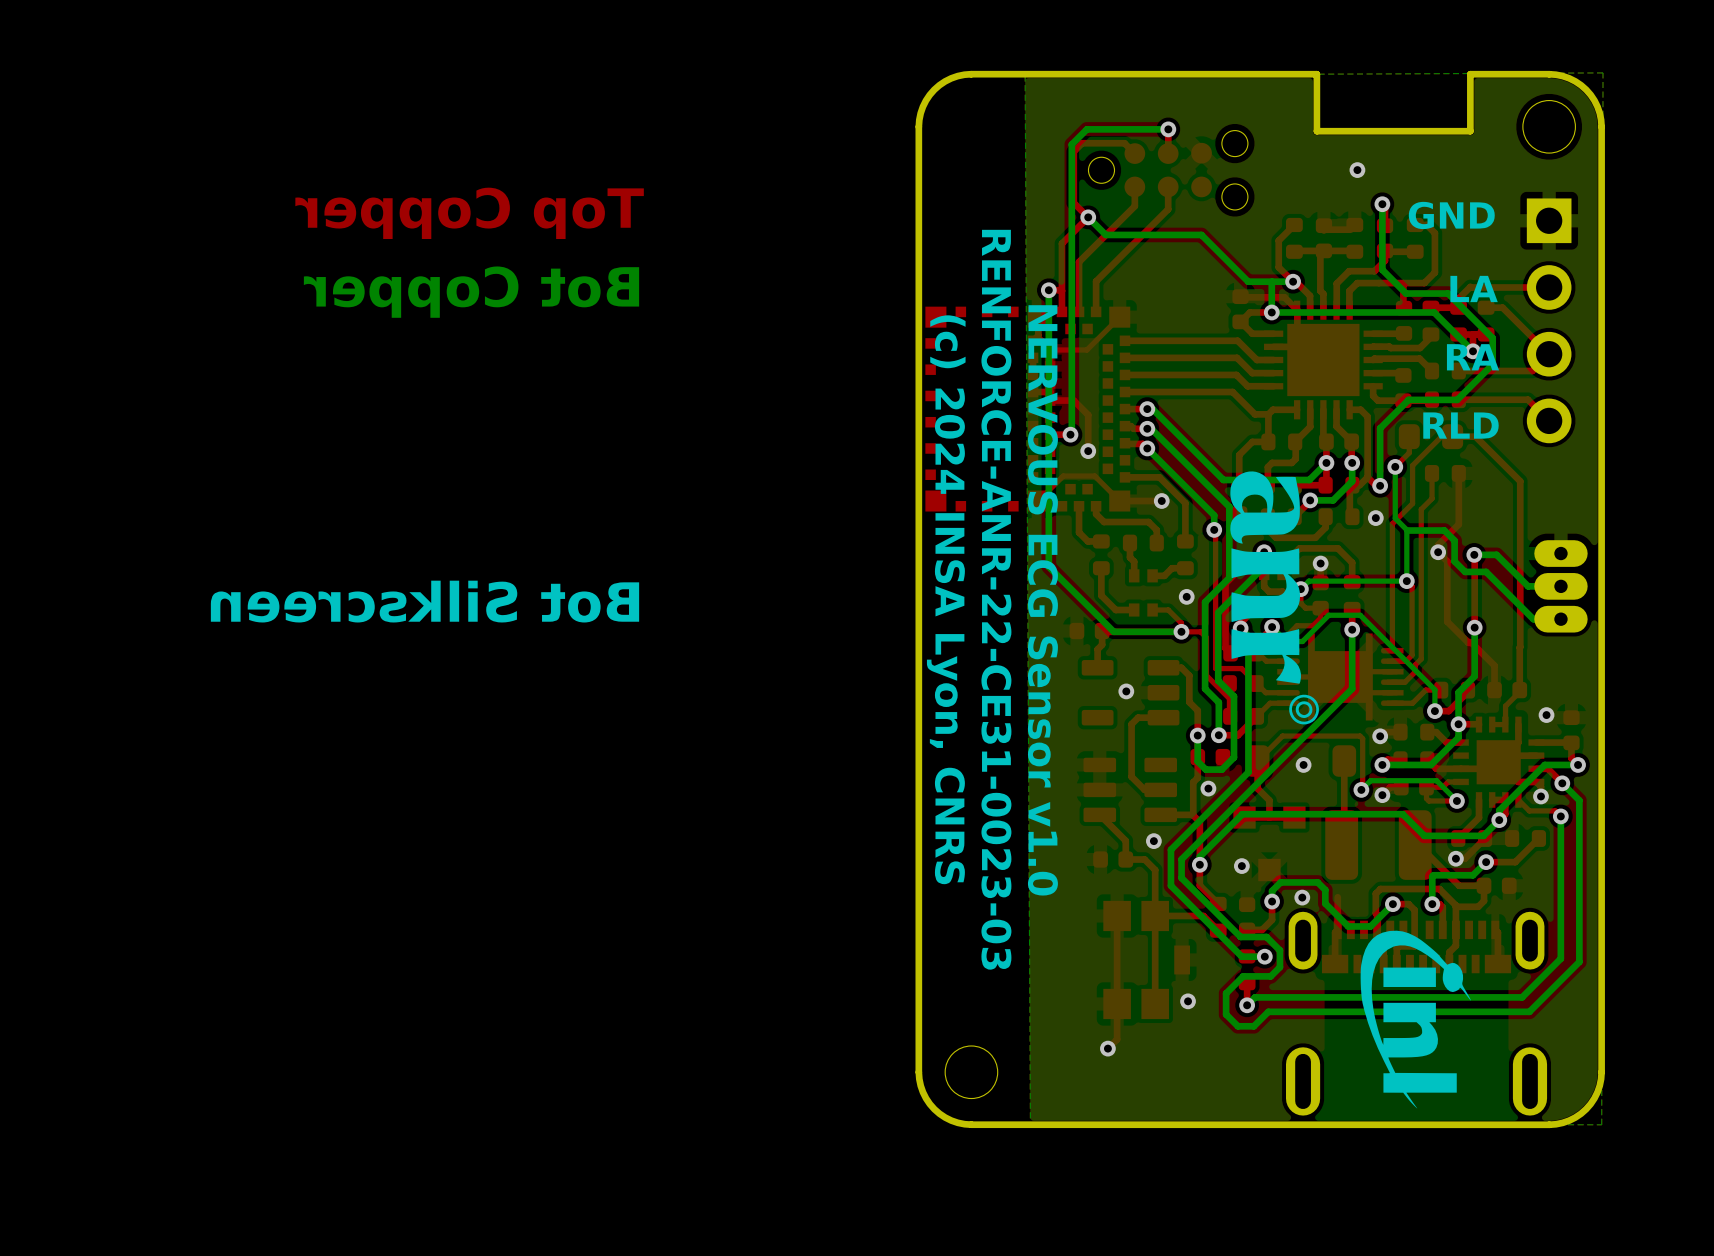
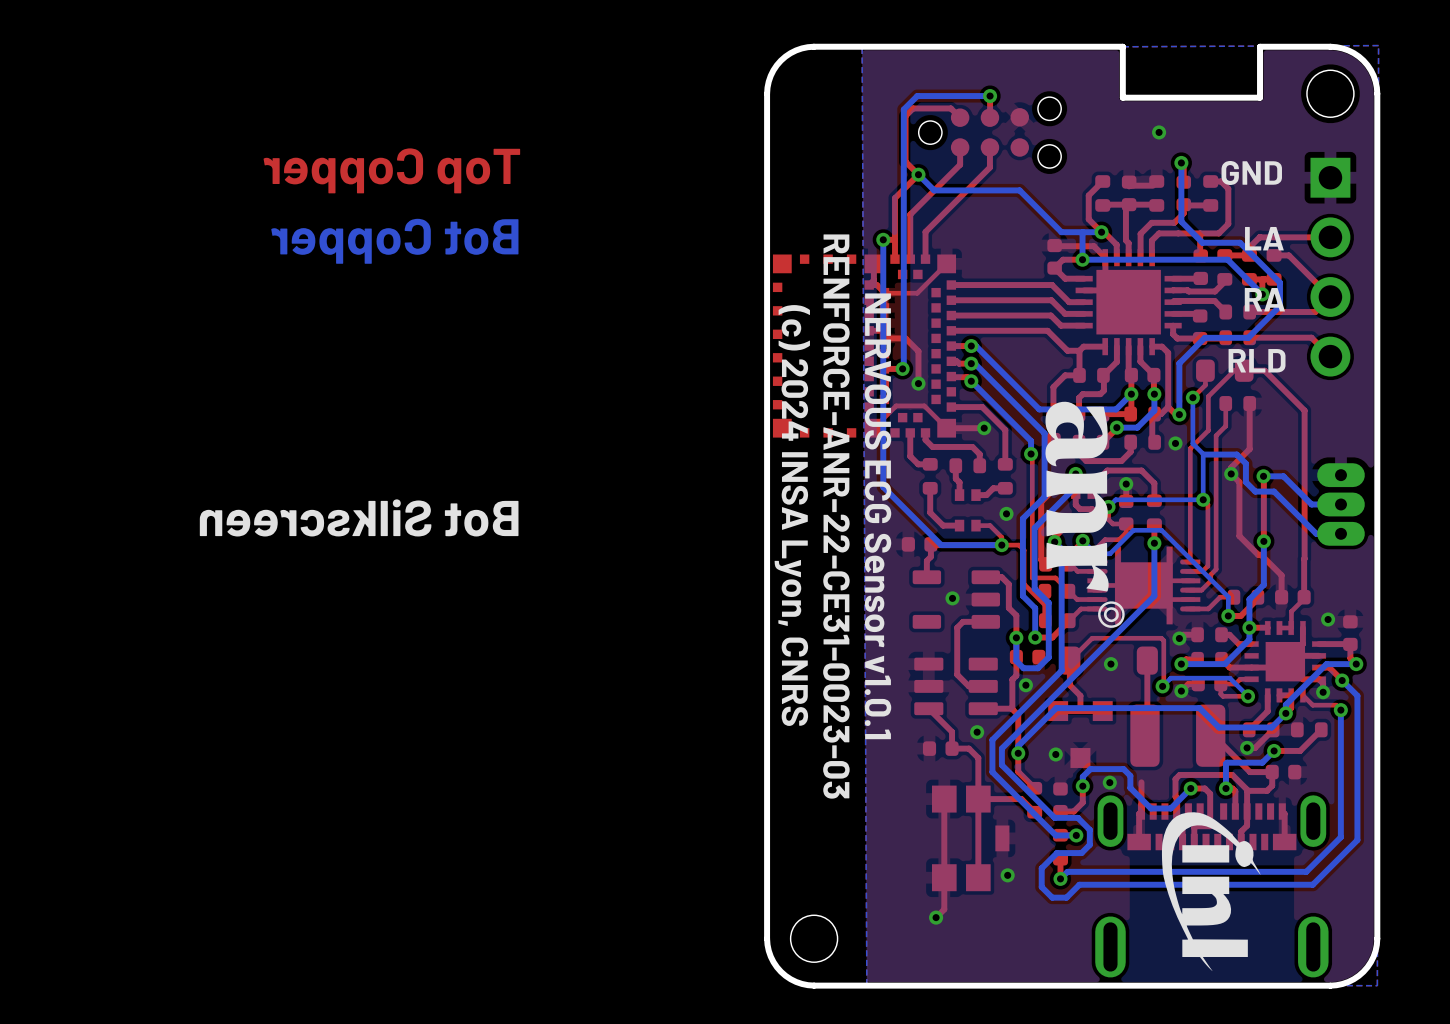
text: NERVOUS ECG Sensor v1.0 (1042, 600) -> NERVOUS ECG Sensor v1.0.1 (877, 516)

